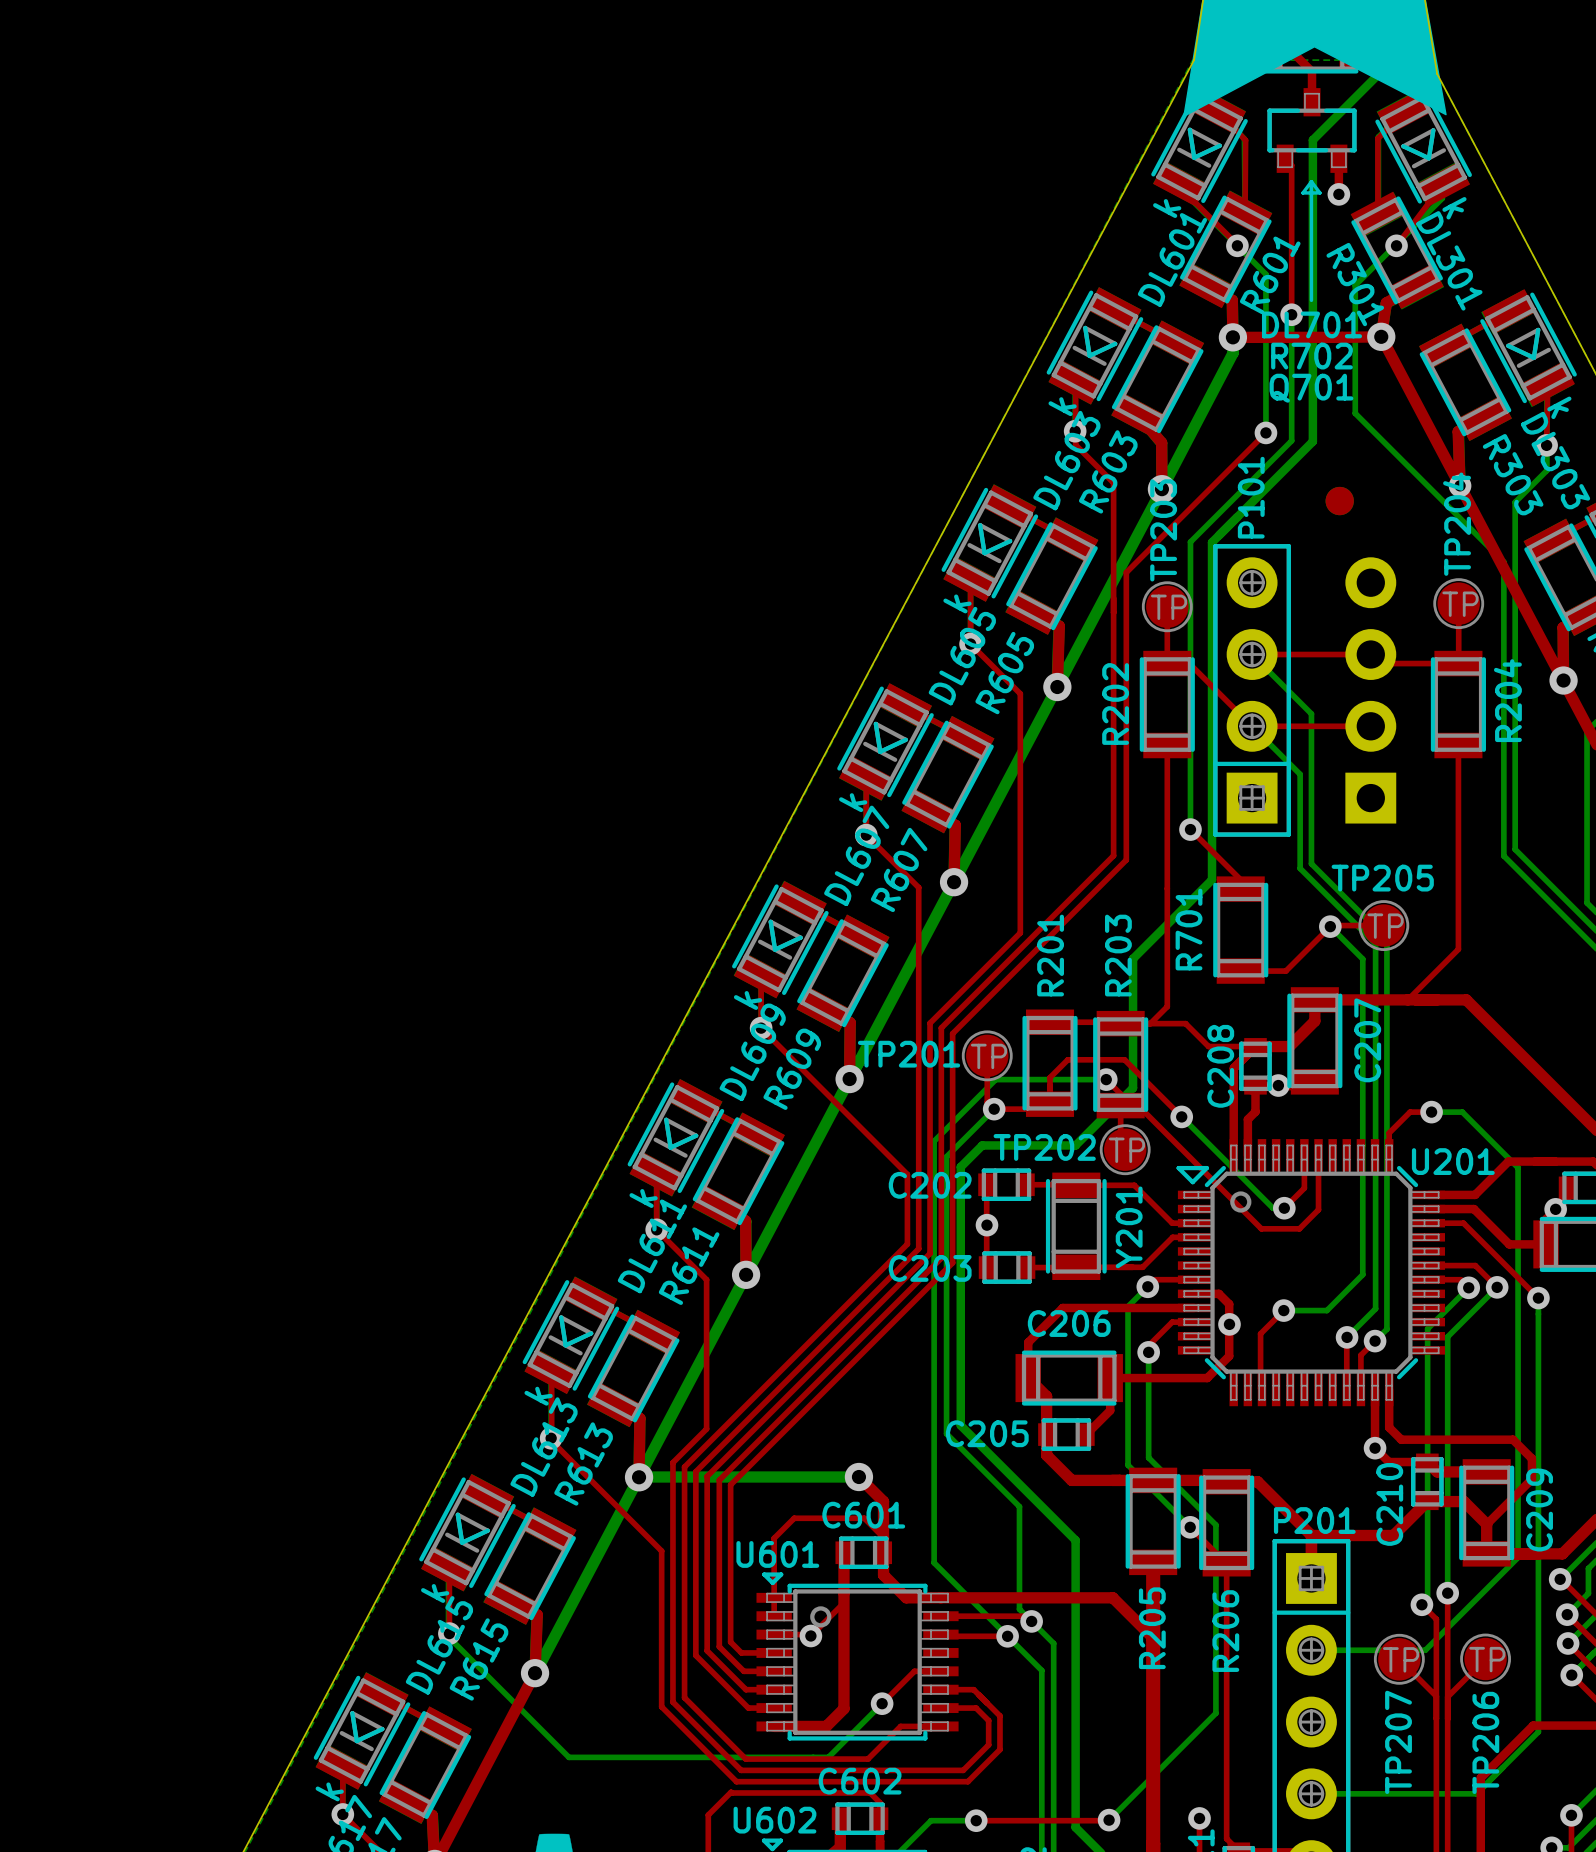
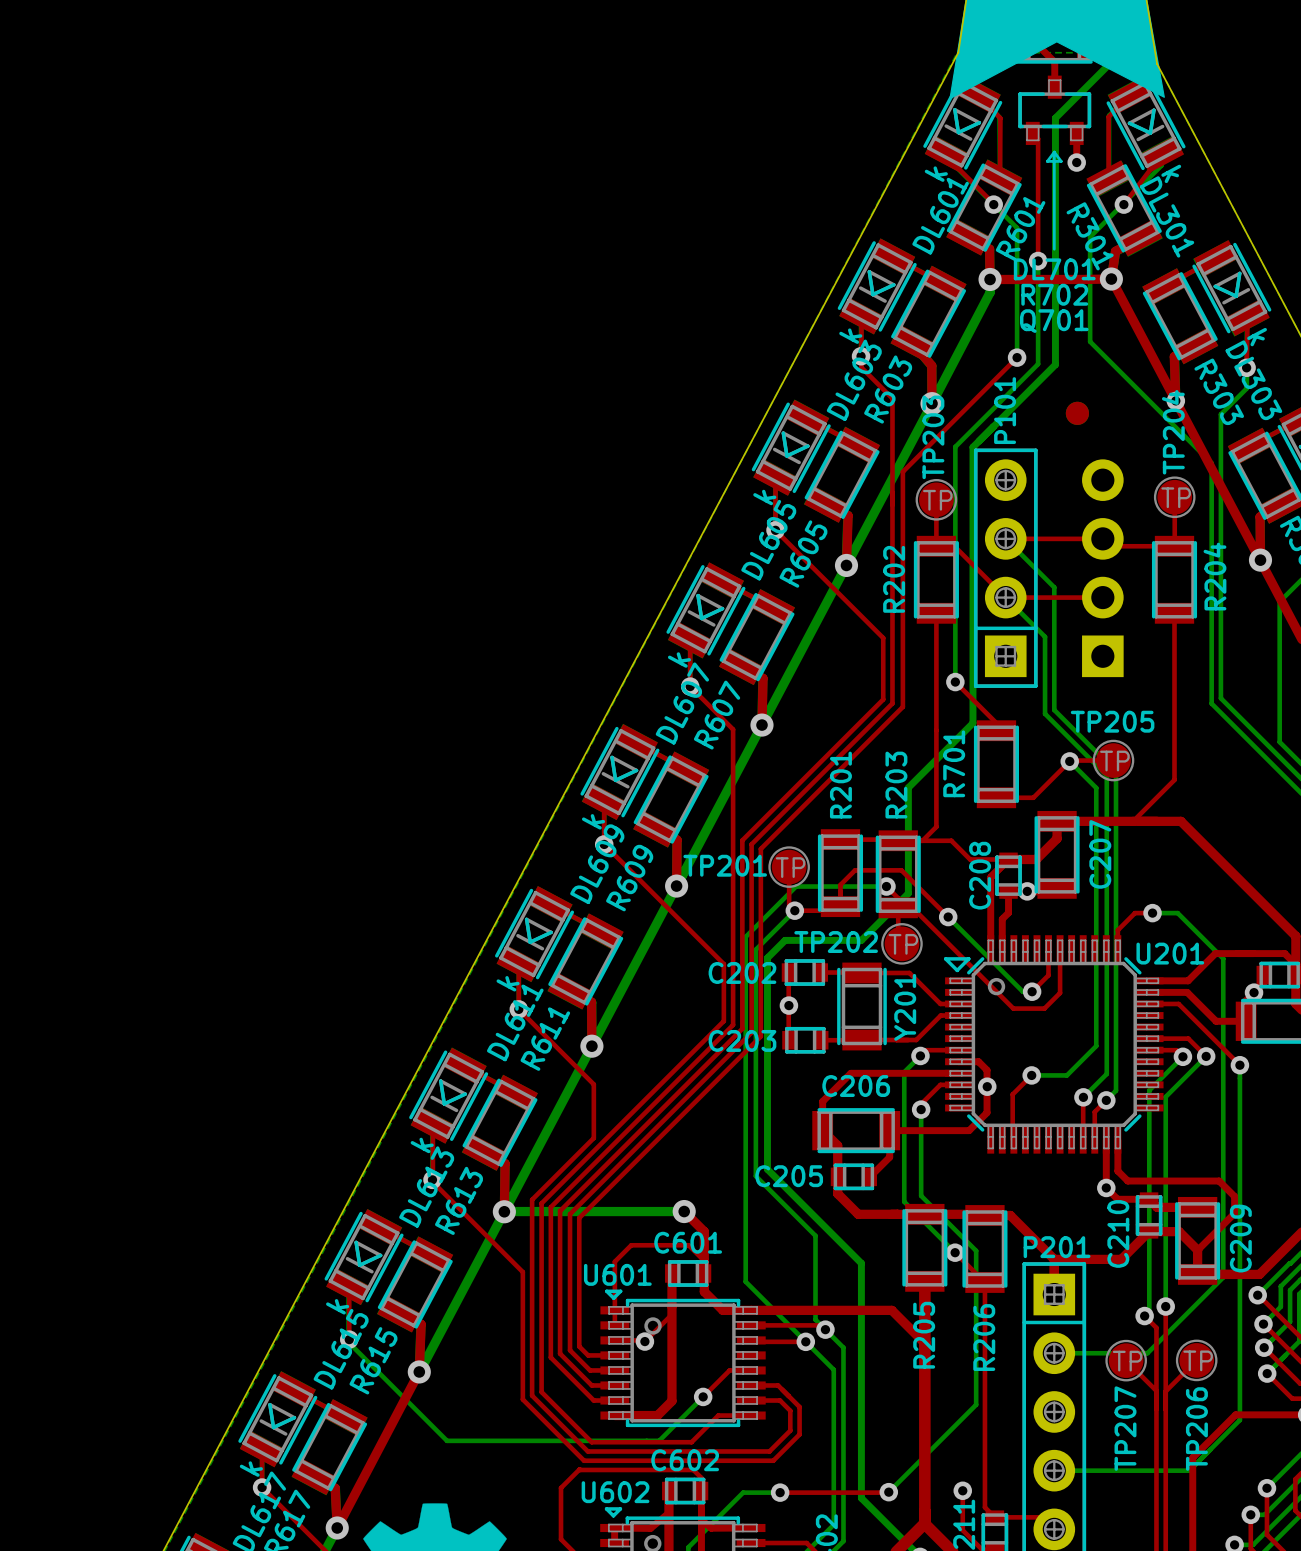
top track: (1020, 693) (1020, 932) -> (816, 571) (883, 638) (883, 699) (816, 766)
top track: (706, 1279) (706, 1428) -> (559, 1050) (593, 1084) (593, 1138) (559, 1172)

